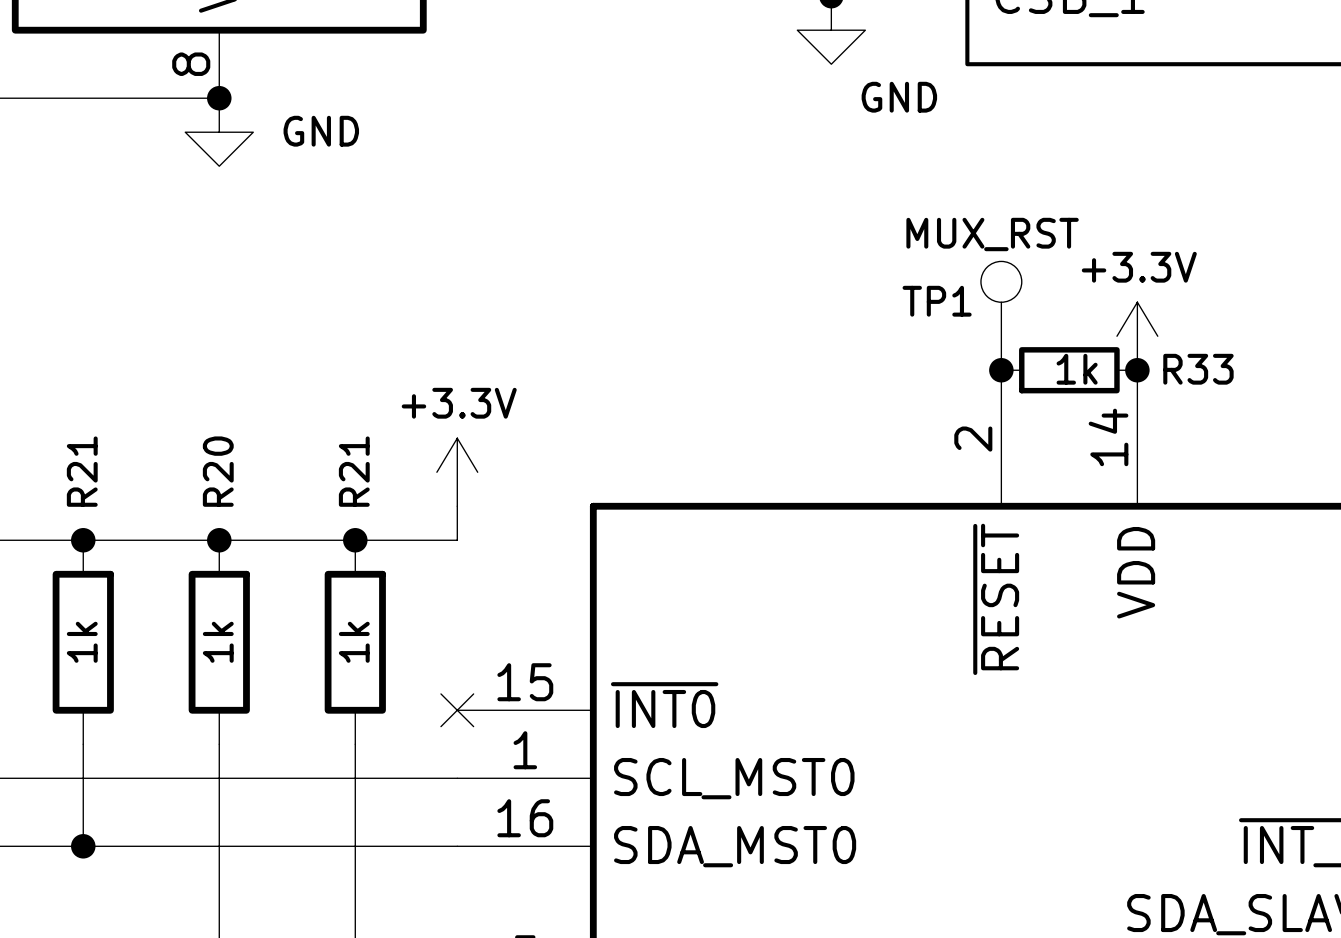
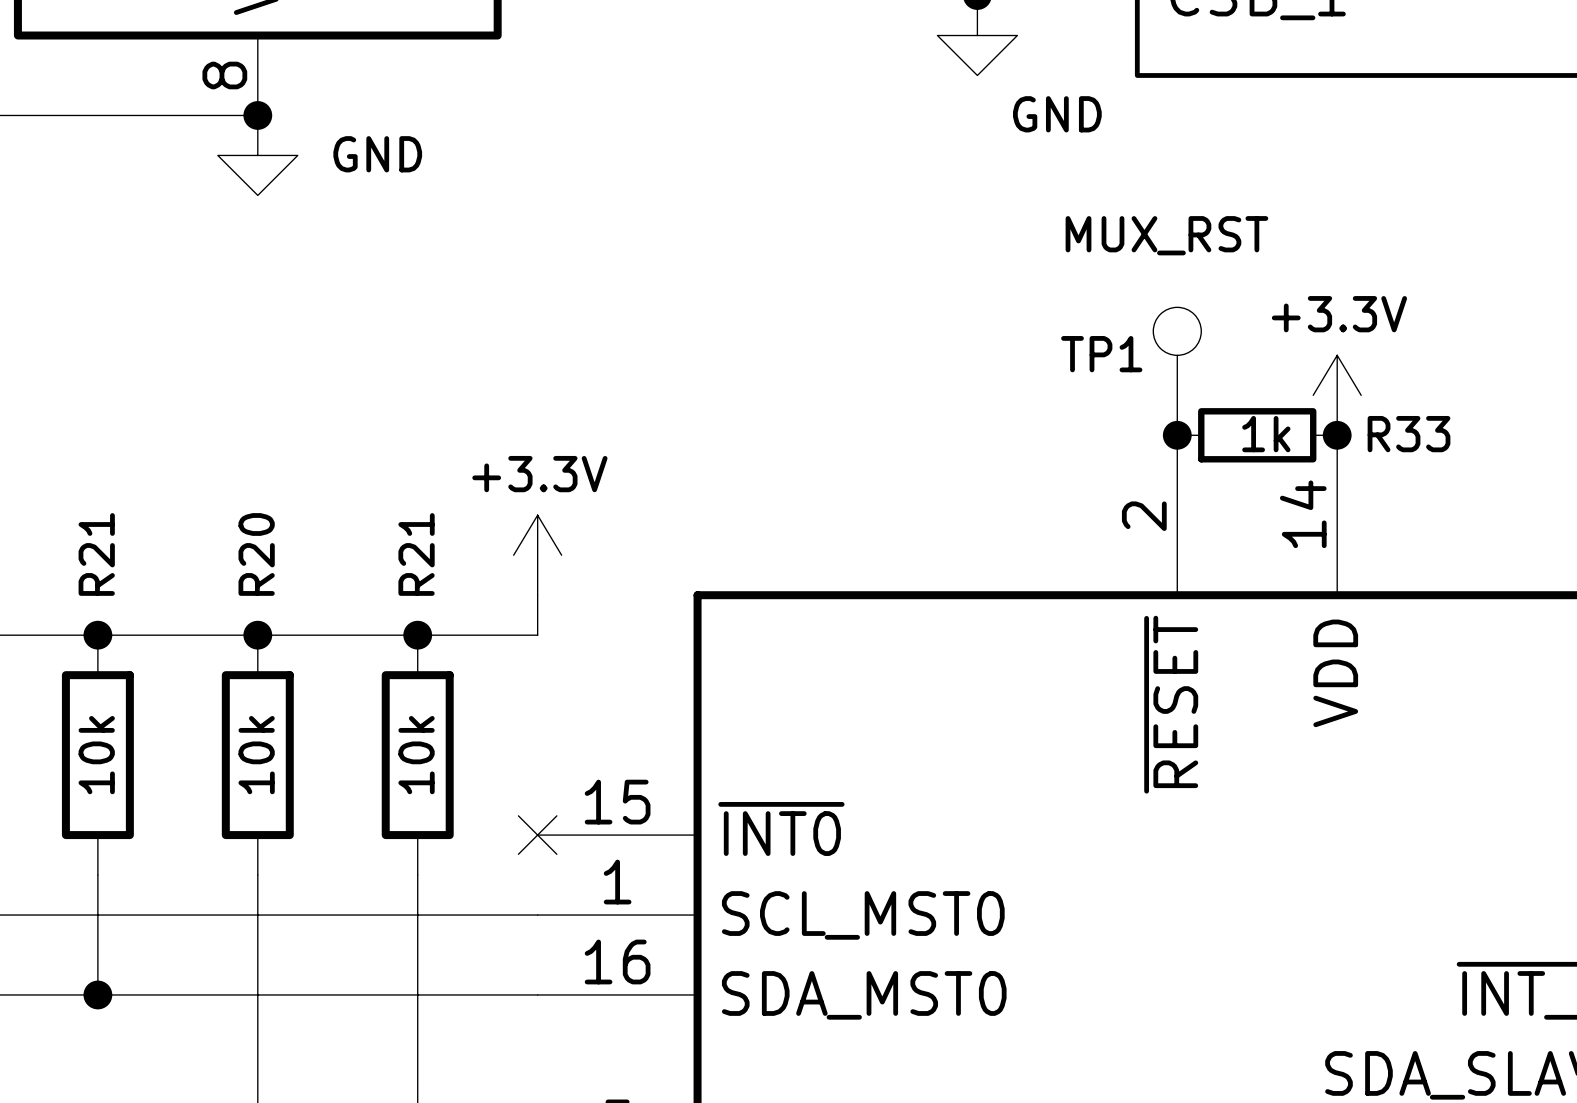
TP1 value position: MUX_RST (992, 234) -> MUX_RST (1166, 235)
R21 value: 1k (82, 642) -> 10k (96, 755)
R20 value: 1k (218, 642) -> 10k (256, 755)
R21 value: 1k (354, 642) -> 10k (416, 755)

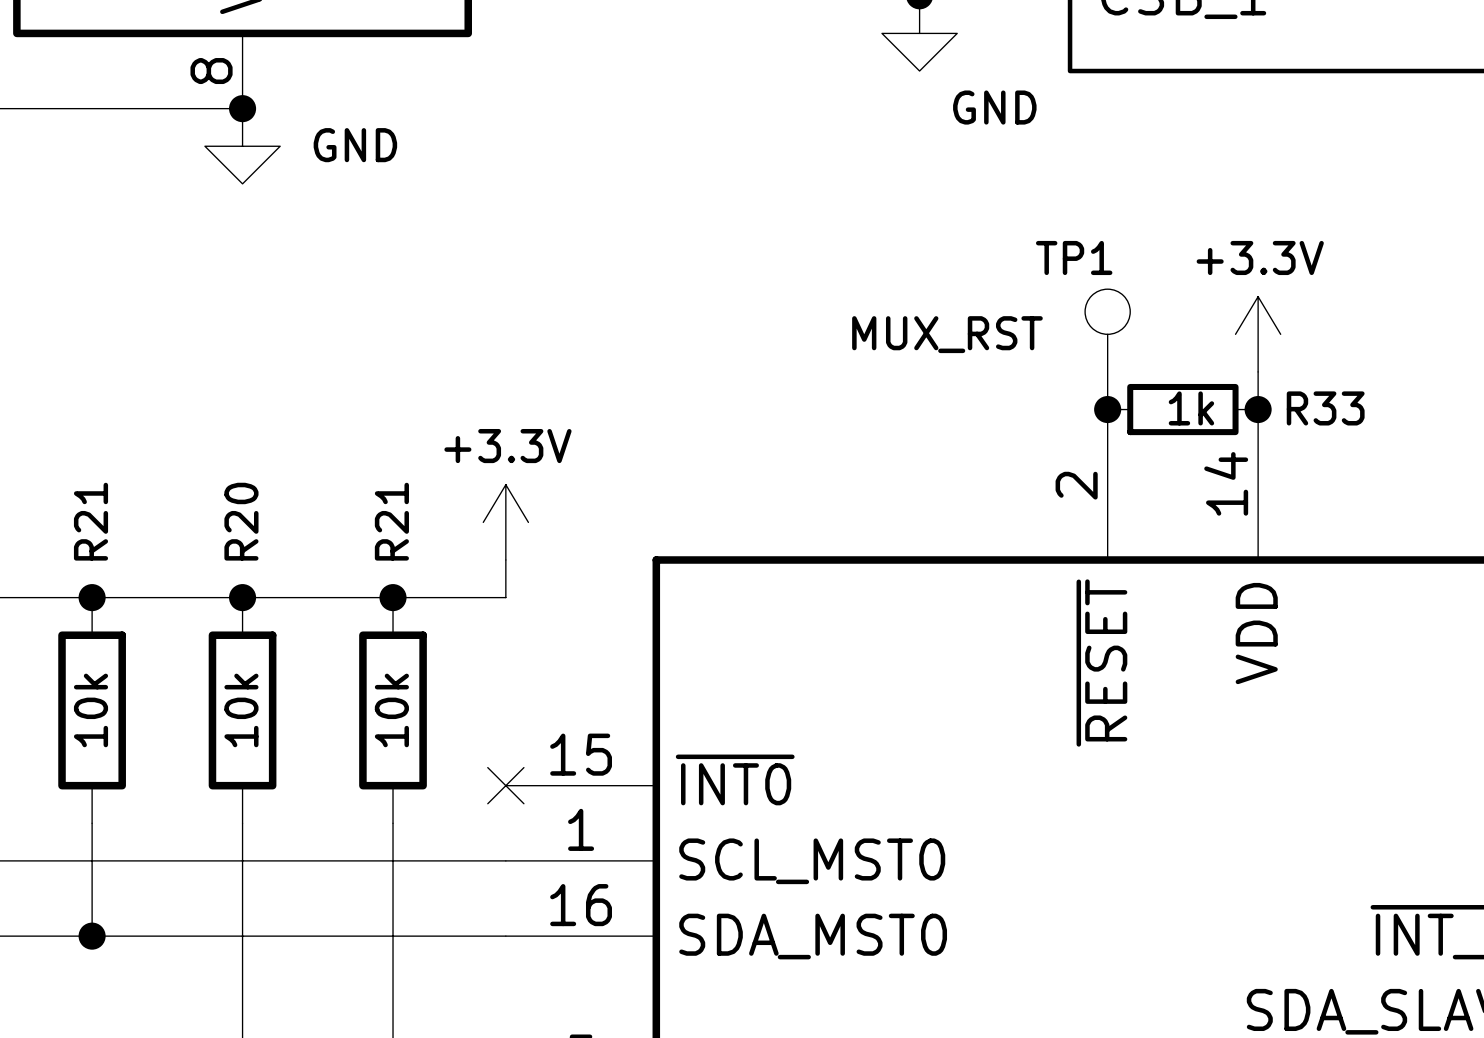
TP1 value position: MUX_RST (1166, 235) -> MUX_RST (947, 334)
TP1 name position: TP1 (1101, 354) -> TP1 (1074, 257)
power symbol position: +3.3V (1337, 395) -> +3.3V (1258, 334)

